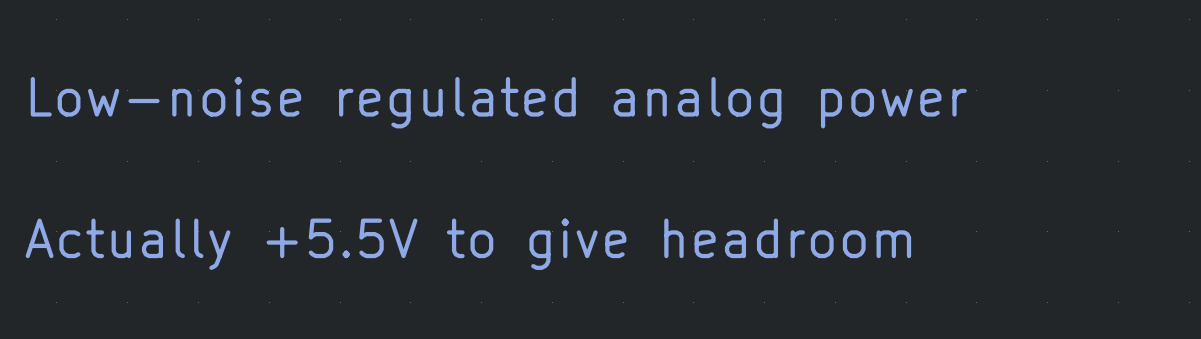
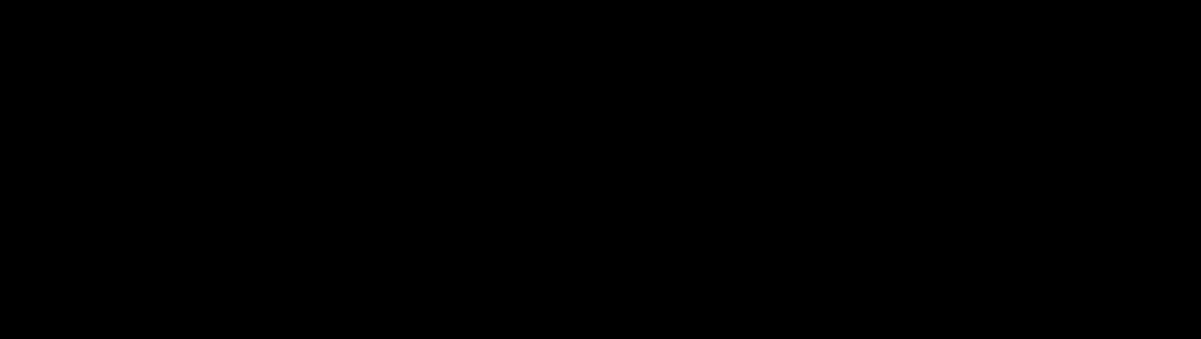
text: Low-noise regulated analog power (498, 102) -> none
text: Actually +5.5V to give headroom (468, 244) -> none

